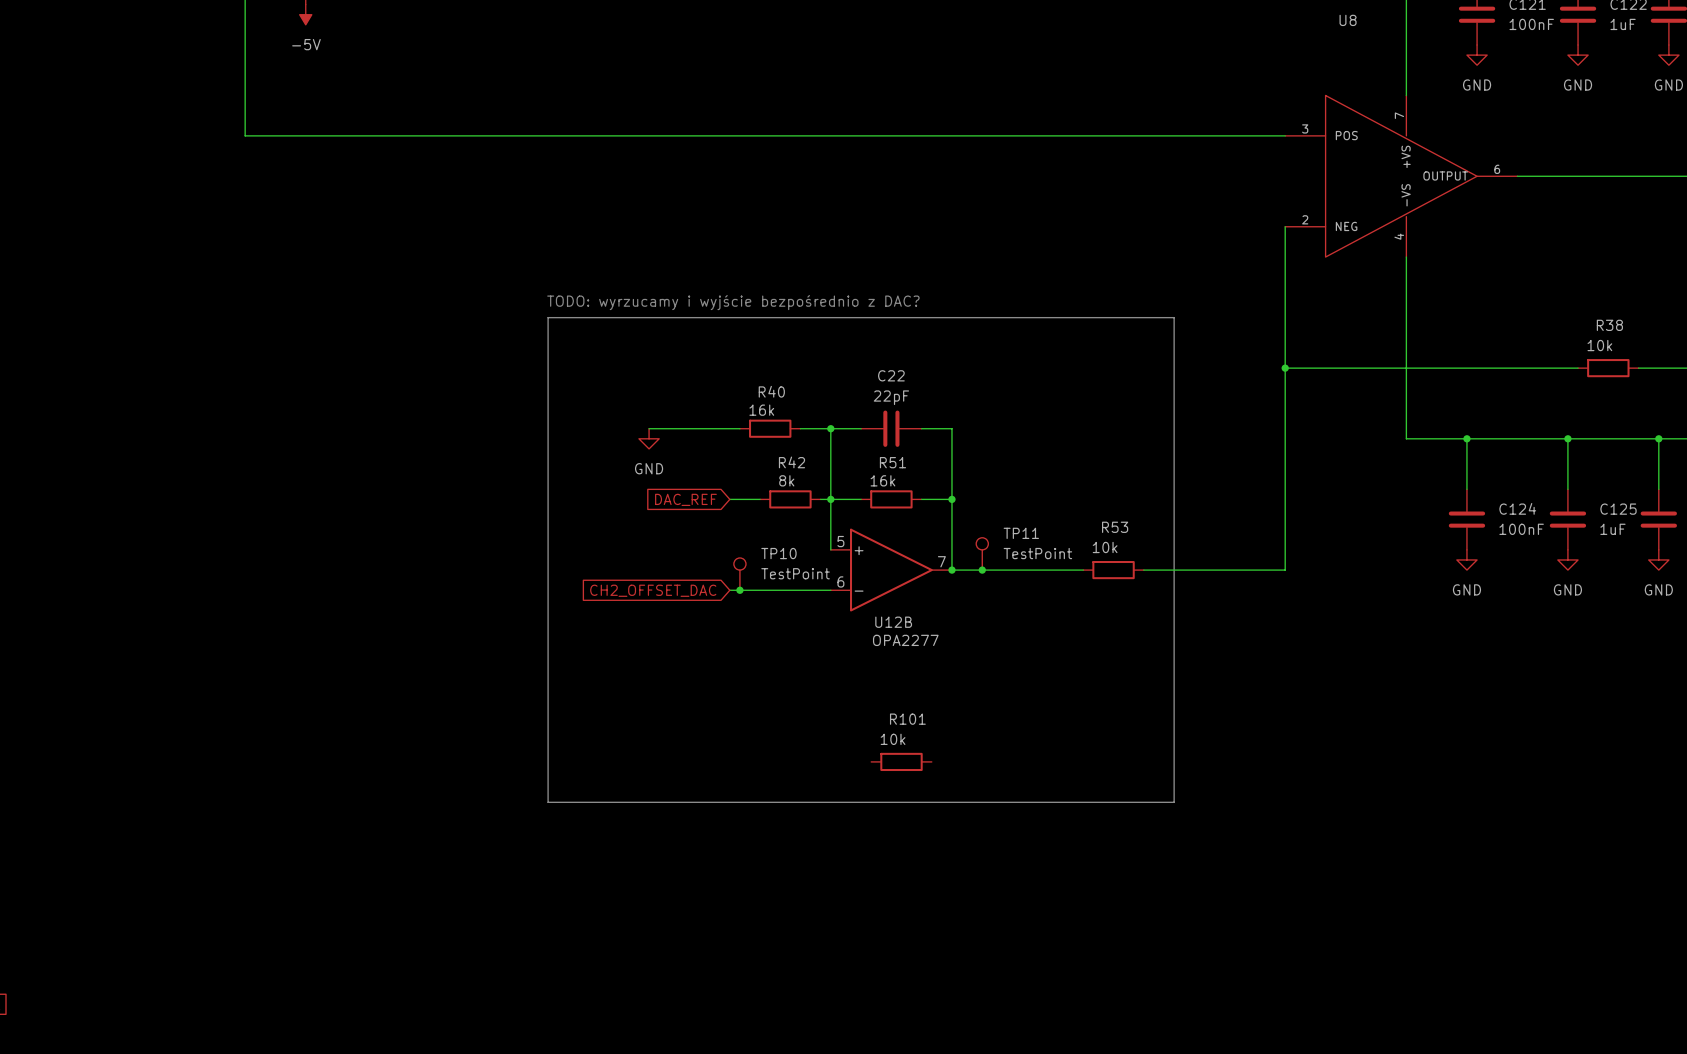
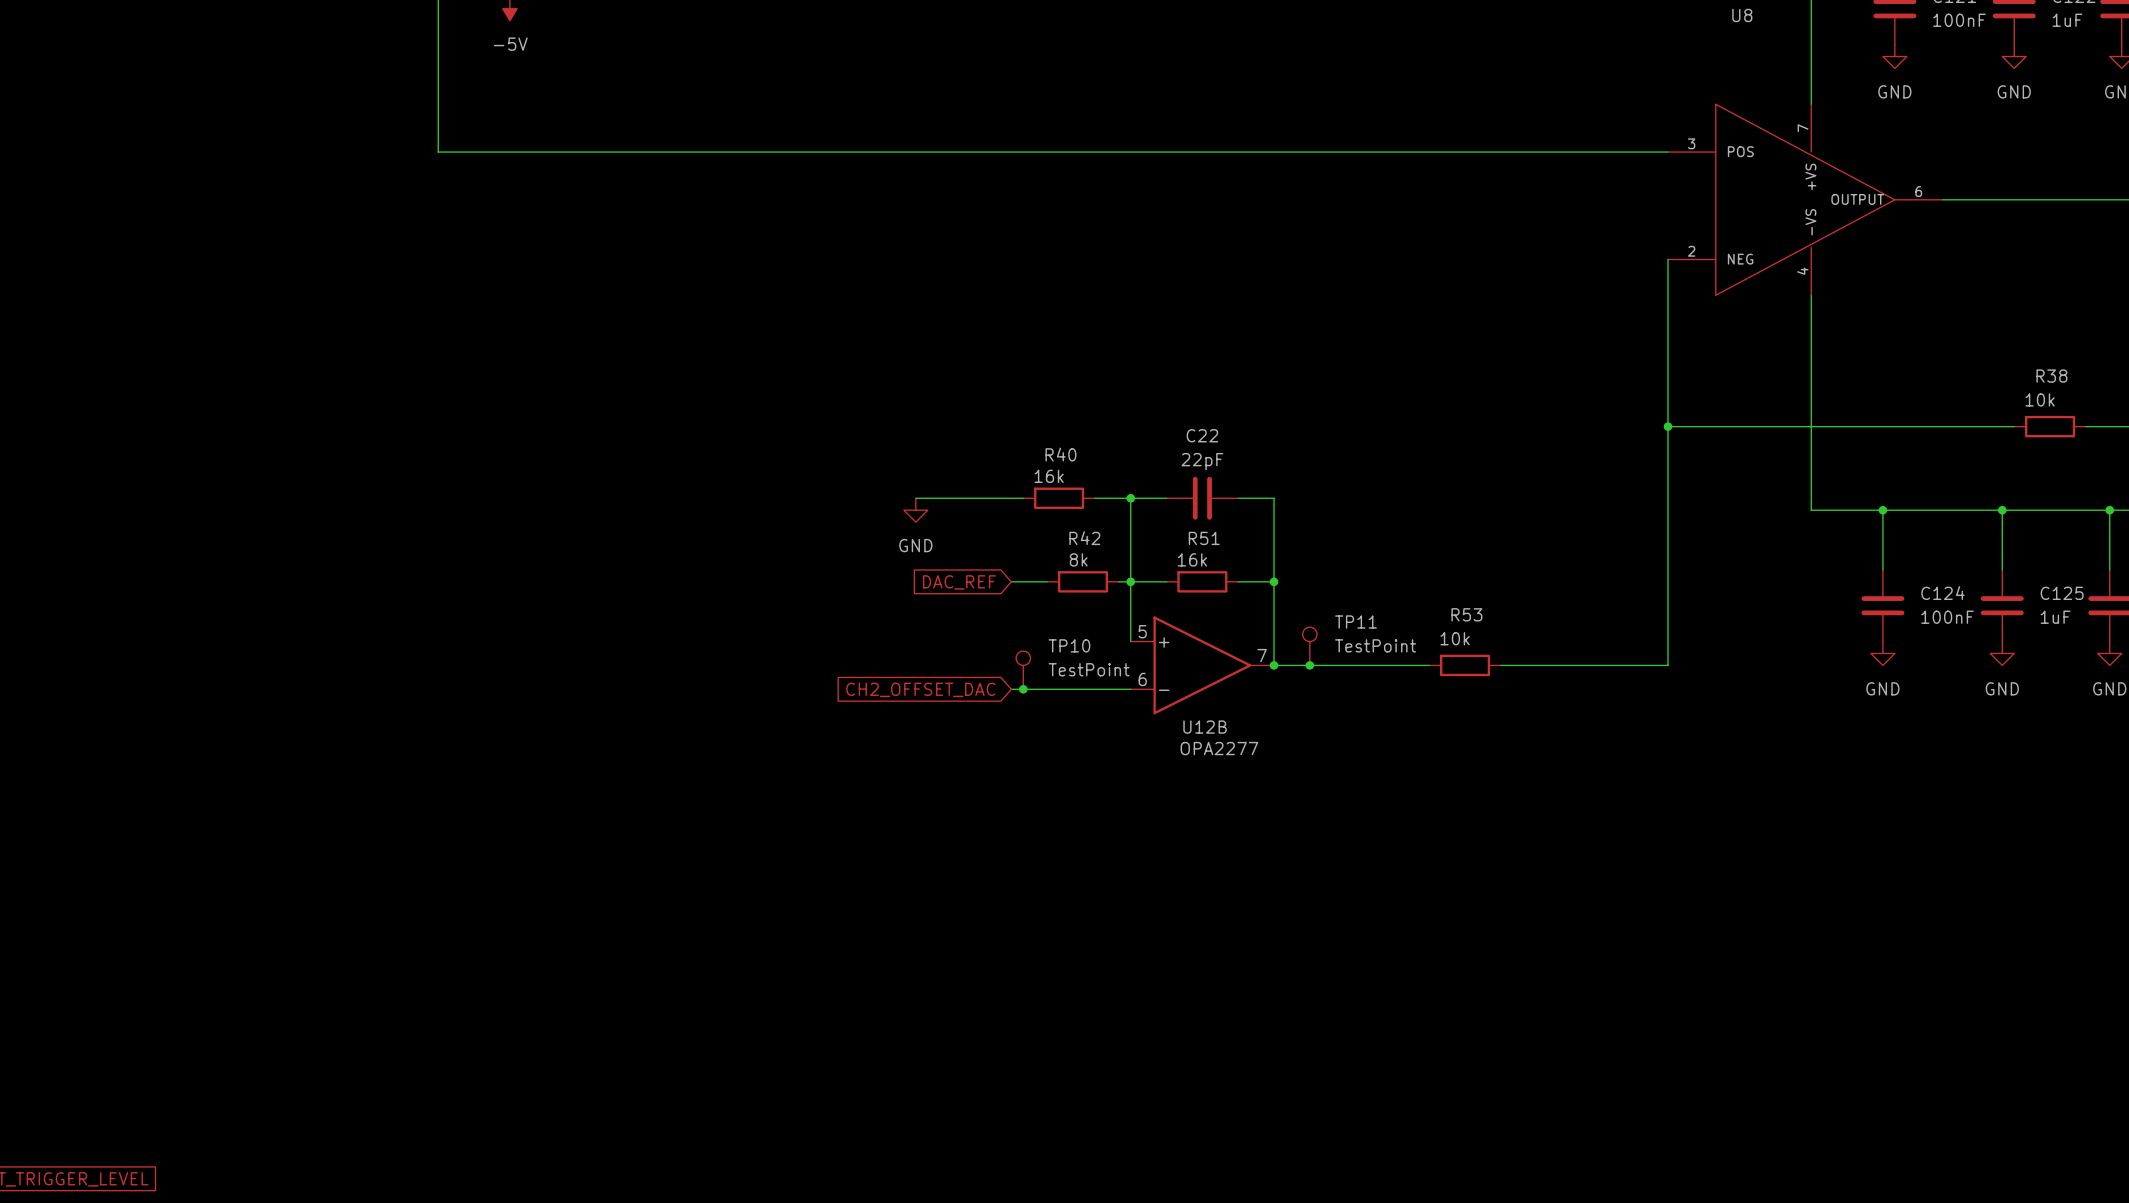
text: TODO: wyrzucamy i wyjście bezpośrednio z DAC? (733, 302) -> none
line: (548, 317) (1174, 317) (1174, 802) (548, 802) (548, 317) -> none
R101: 10k (901, 761) -> none

